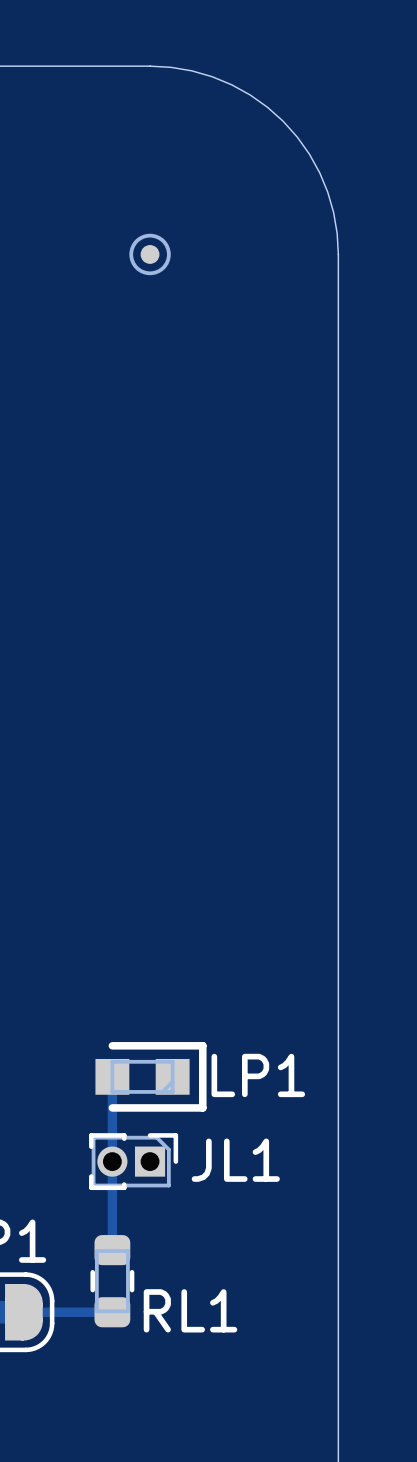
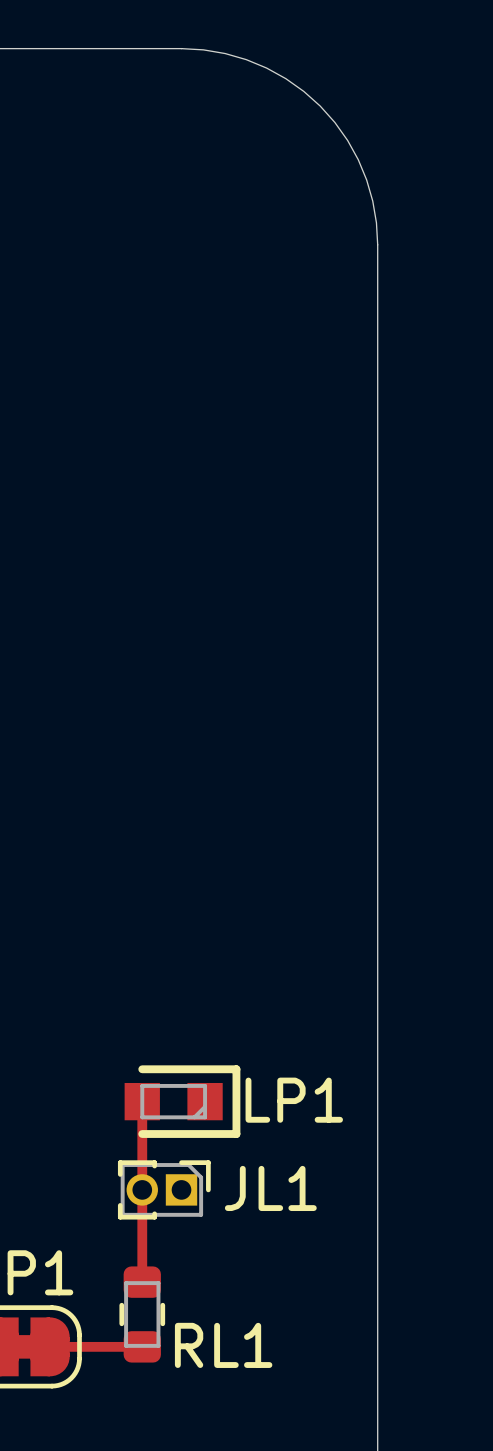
part: (150, 254) -> none

